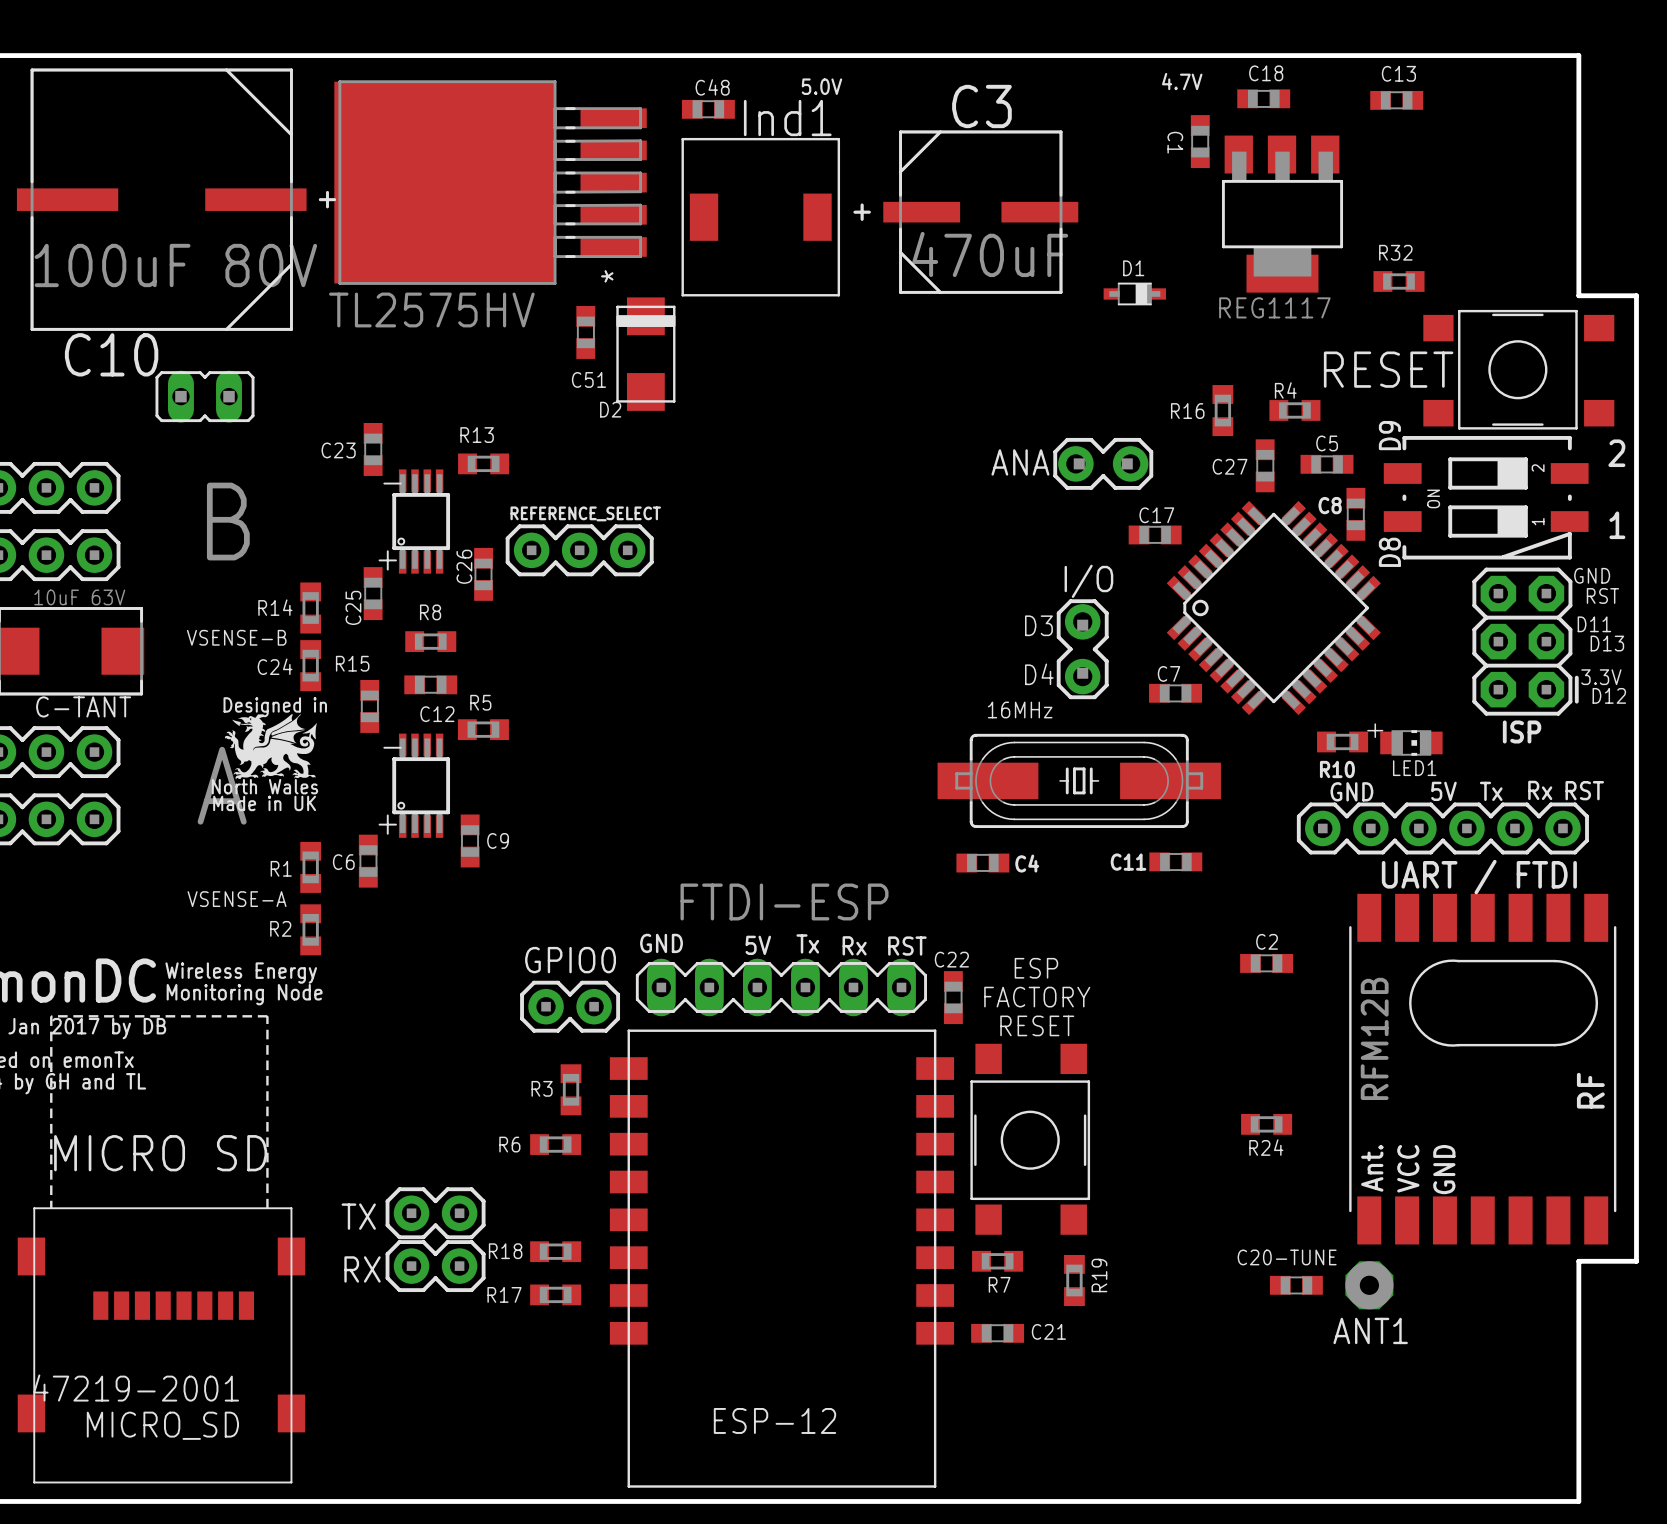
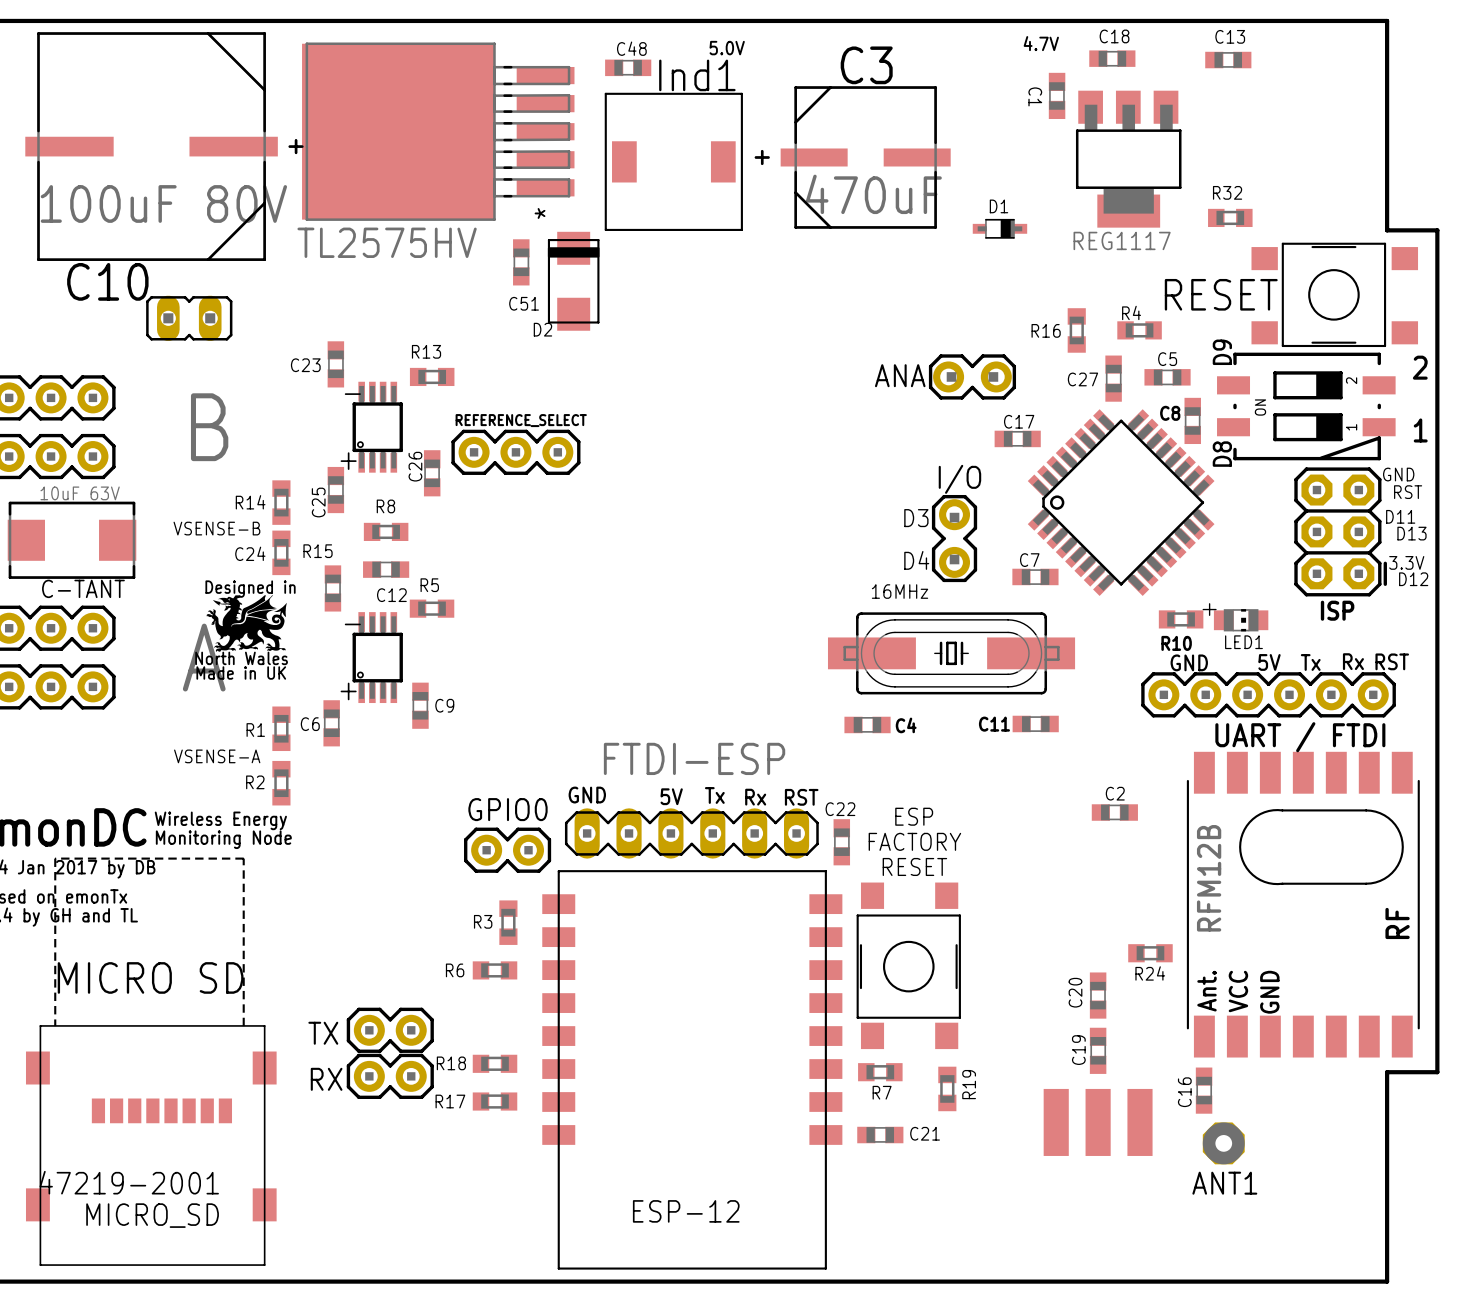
R24 position: (1266, 1124) -> (1150, 953)
C20: none -> (1098, 995)
C19: none -> (1098, 1050)
C16: none -> (1204, 1090)
C20-TUNE: (1296, 1285) -> none
ANT1 position: (1369, 1285) -> (1223, 1143)
part: none -> (1098, 1122)

